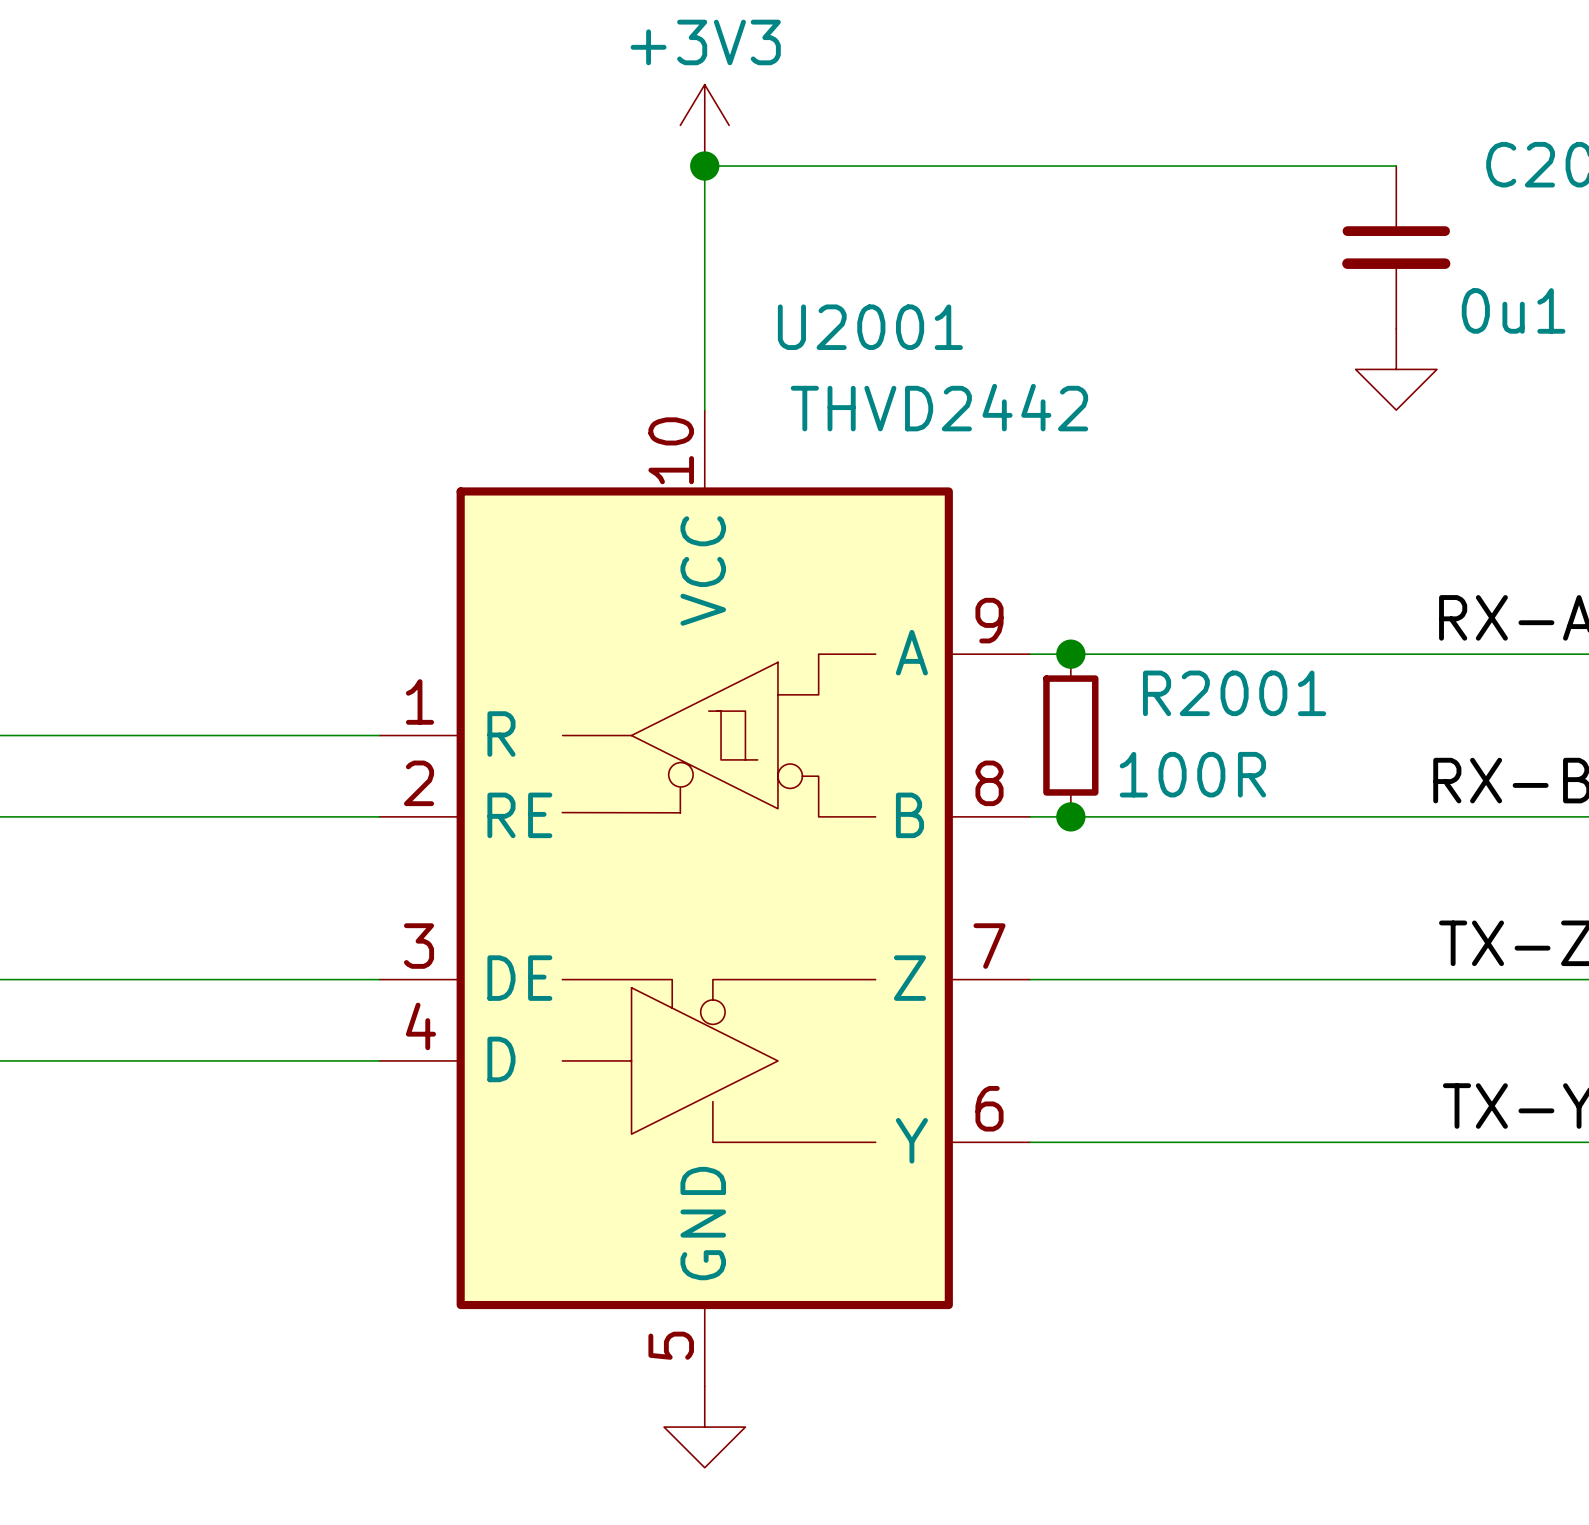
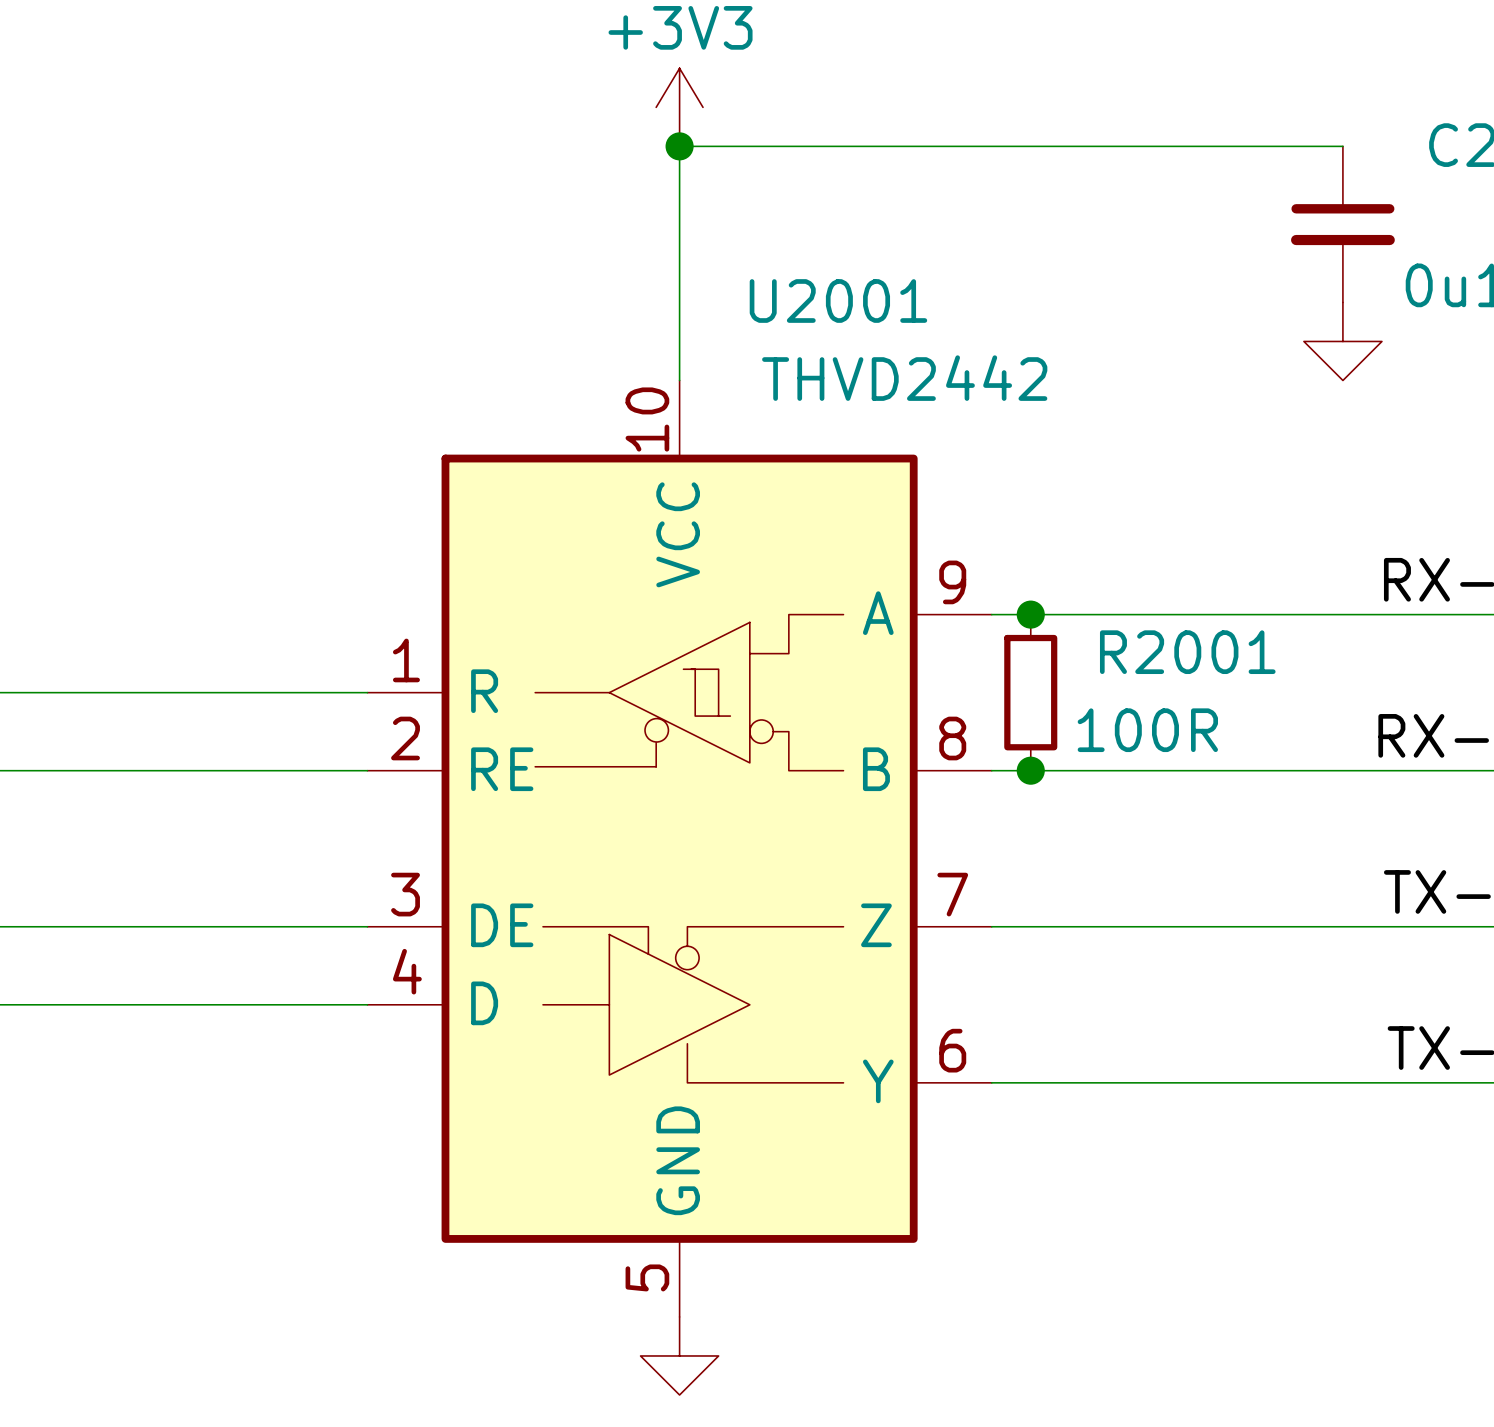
U2001 symbol: [379, 410, 1031, 1387] -> [367, 380, 992, 1317]

